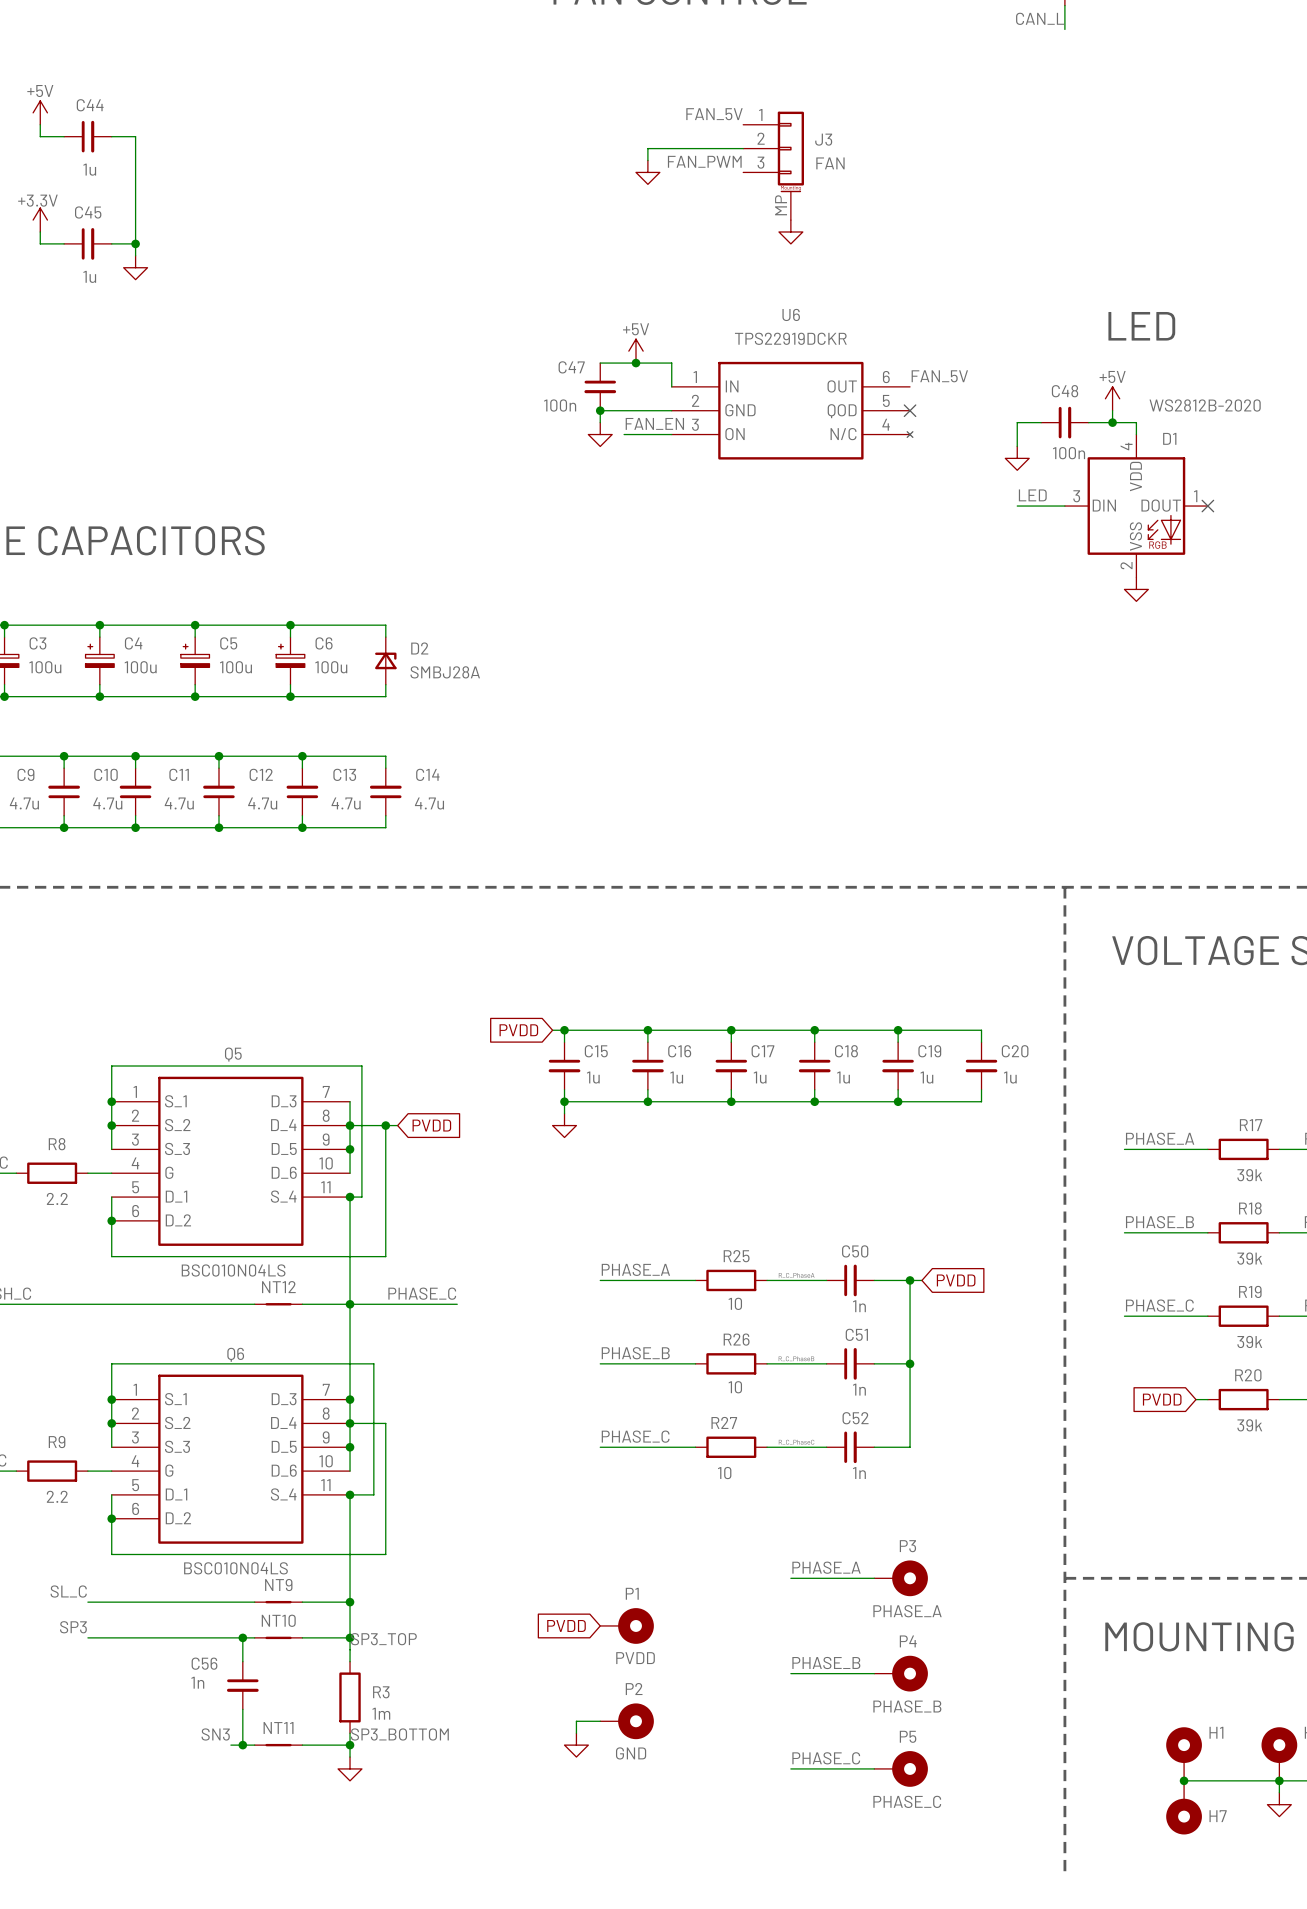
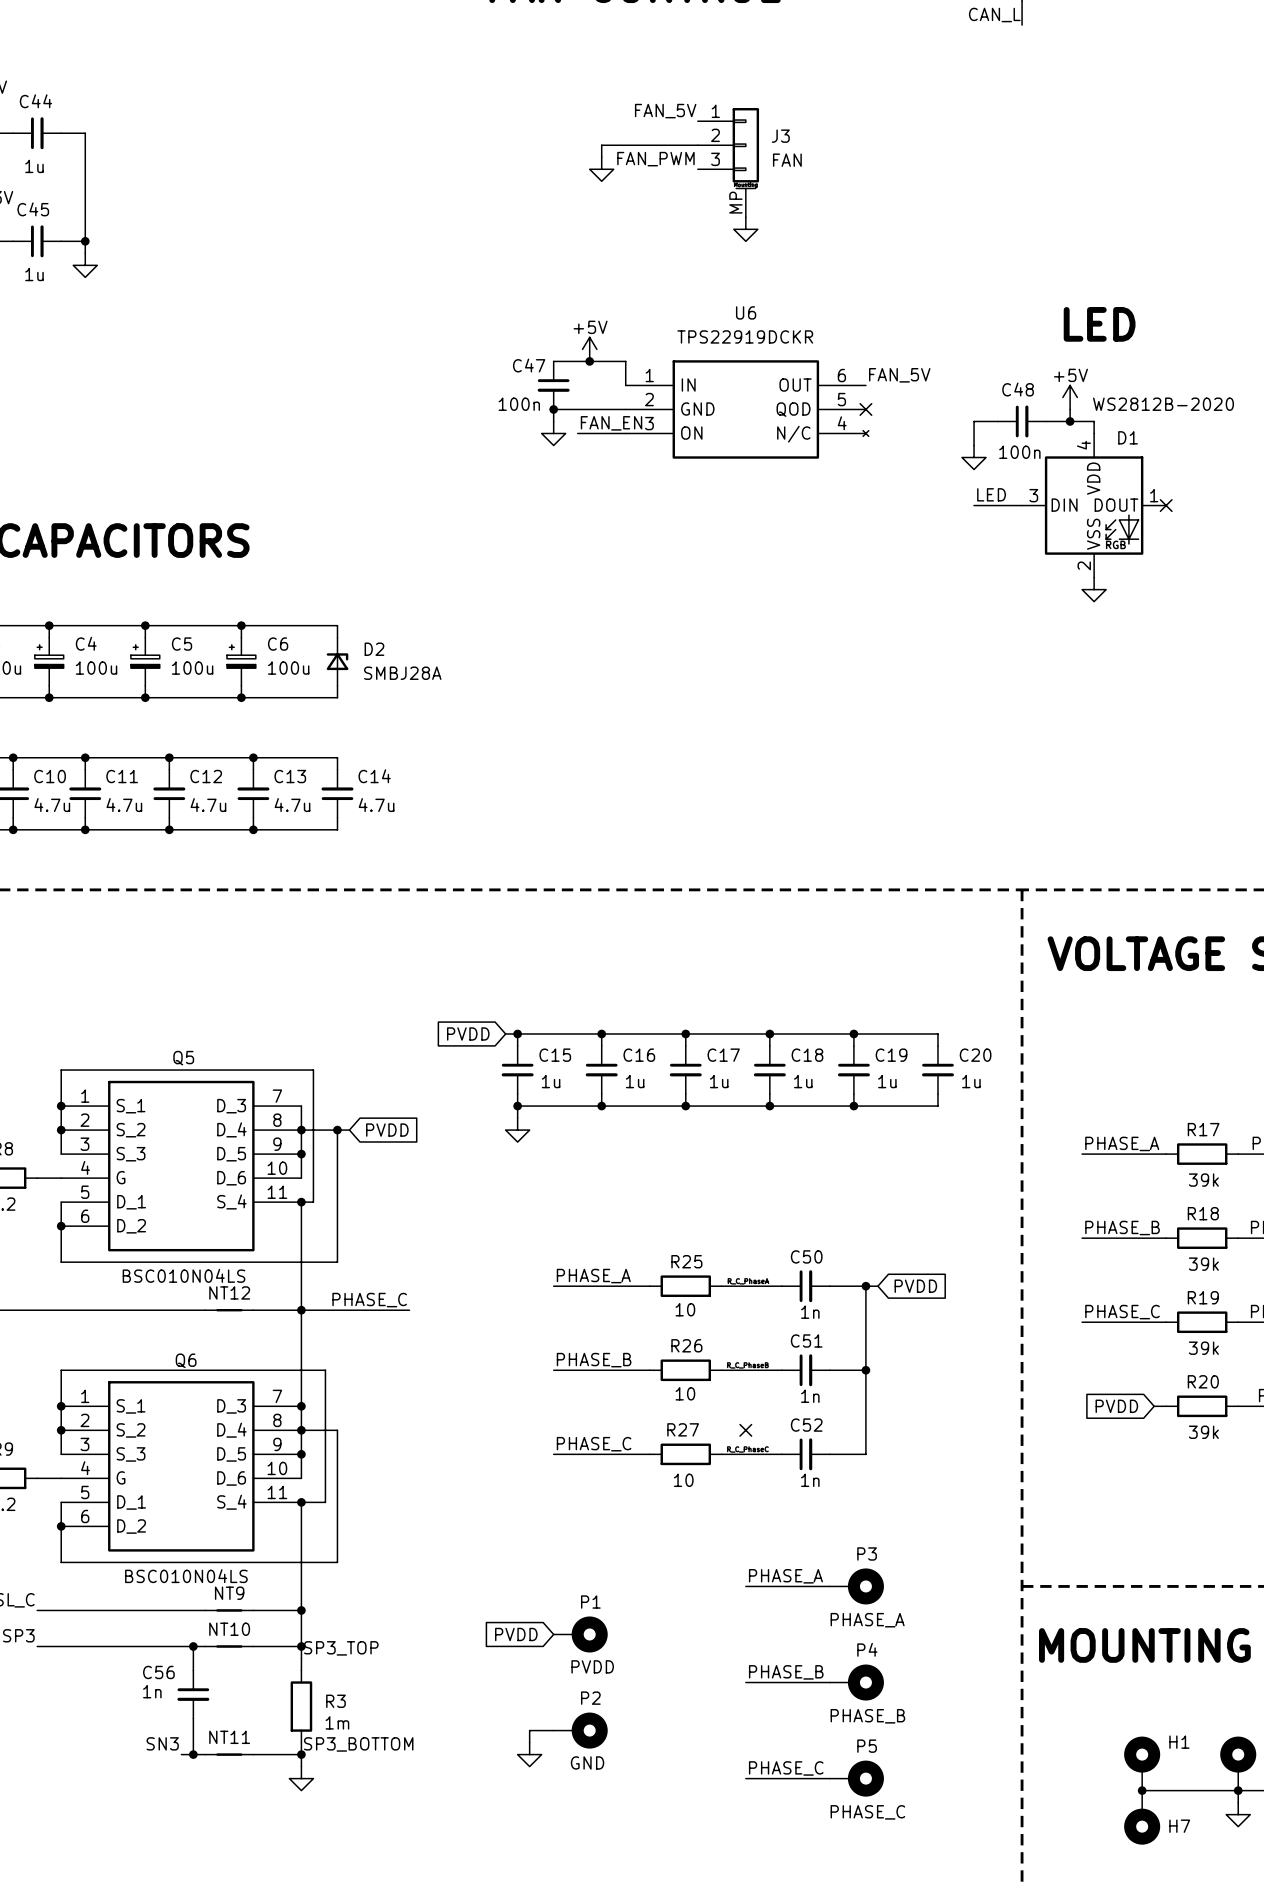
no-connect mark: none -> (745, 1430)

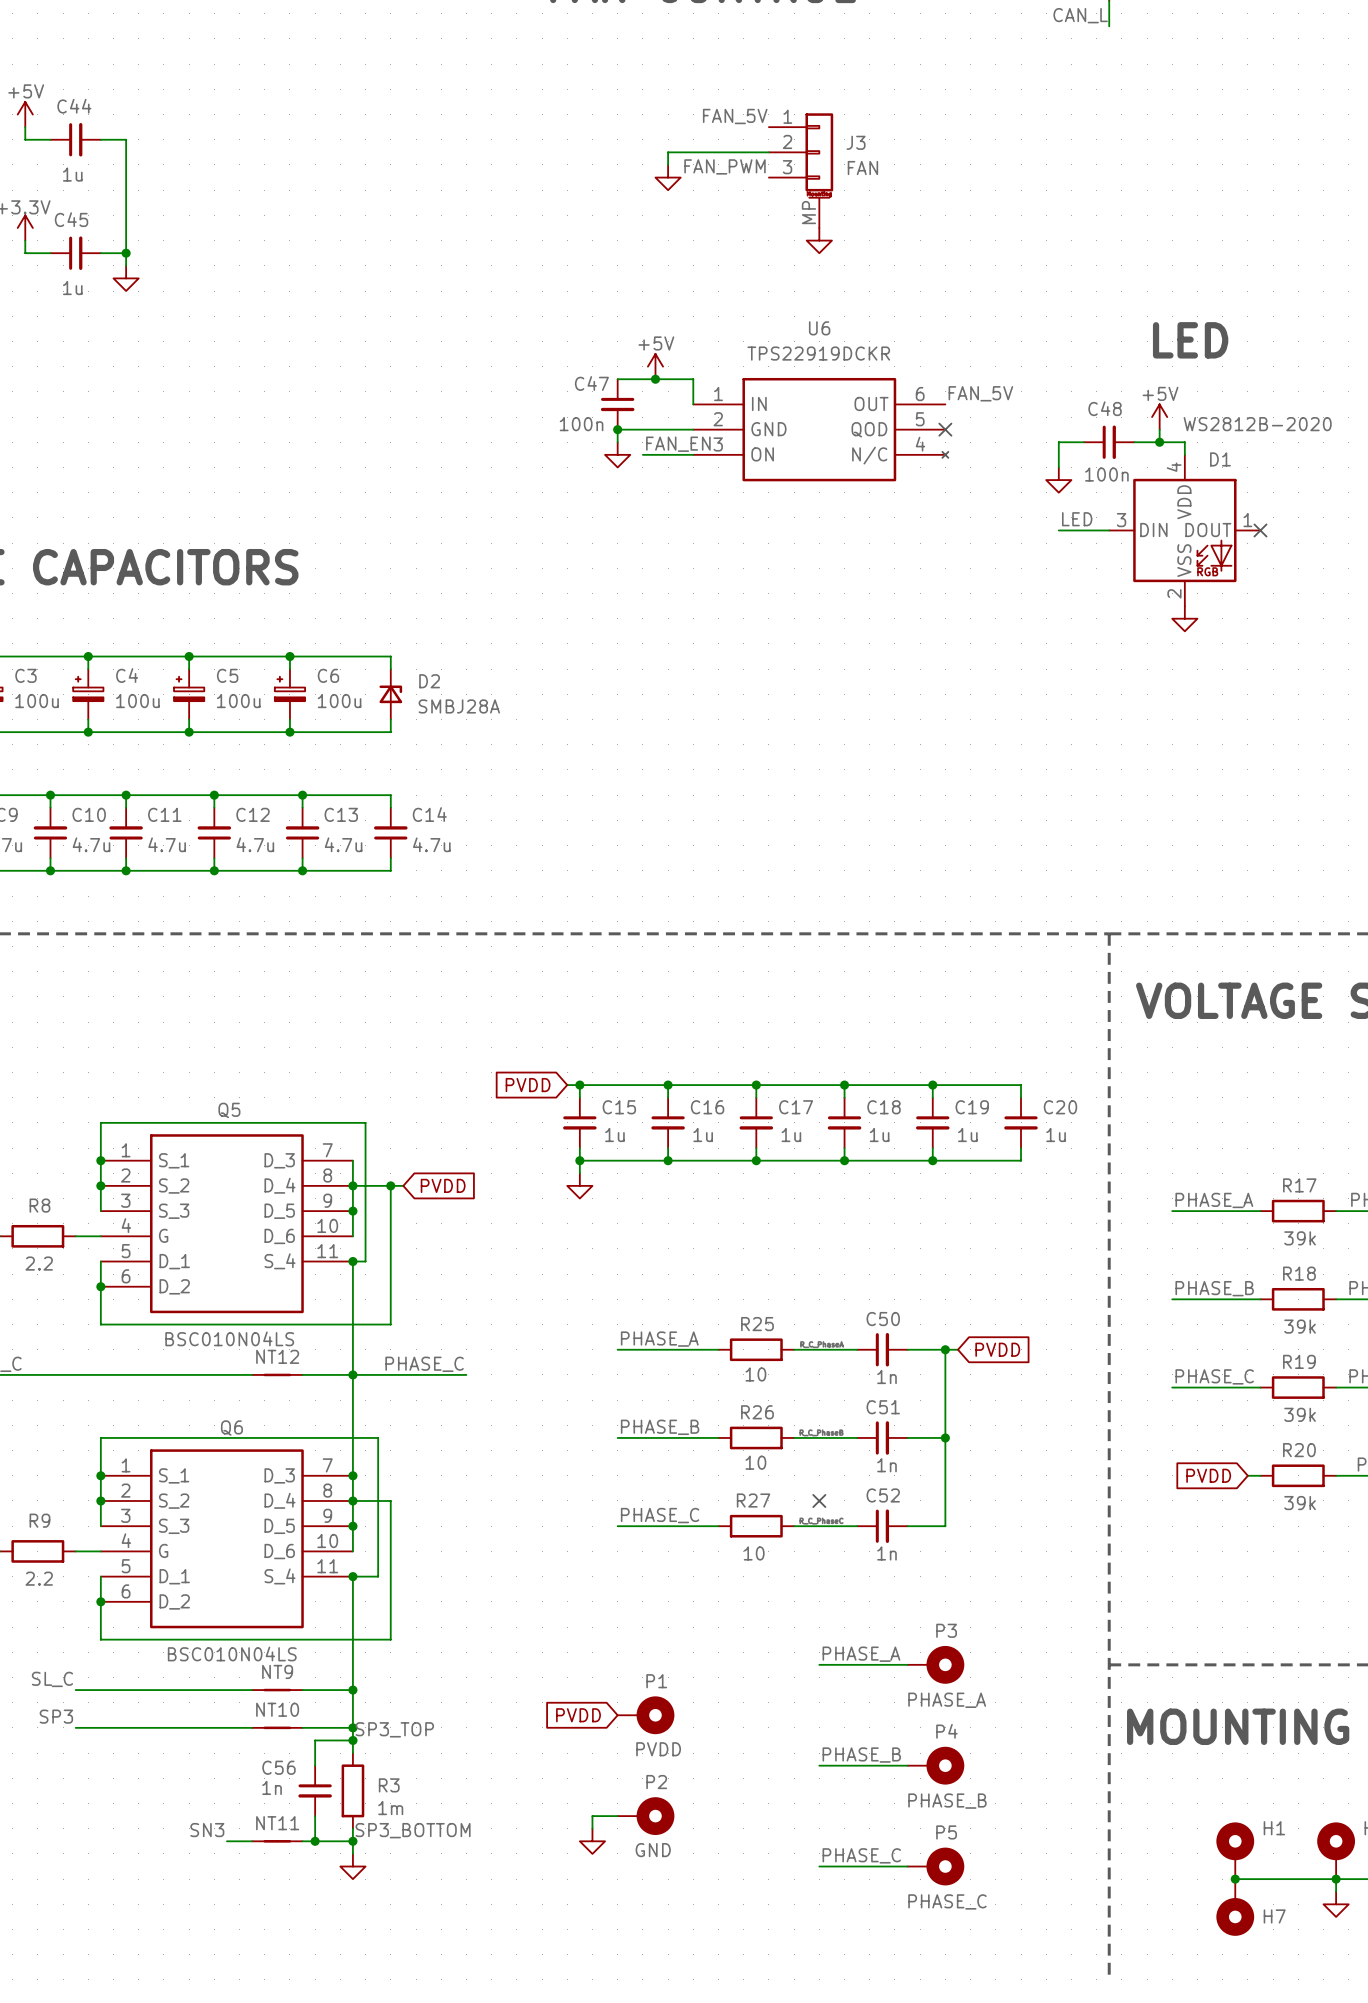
wire: (193, 1646) (193, 1670) -> (315, 1816) (315, 1841)
junction: (193, 1646) -> none
wire: none -> (352, 1740) (315, 1740) (315, 1765)
junction: none -> (352, 1740)
C56 position: (193, 1694) -> (315, 1790)
wire: (193, 1718) (193, 1754) -> none
junction: (193, 1754) -> none
junction: none -> (315, 1841)

